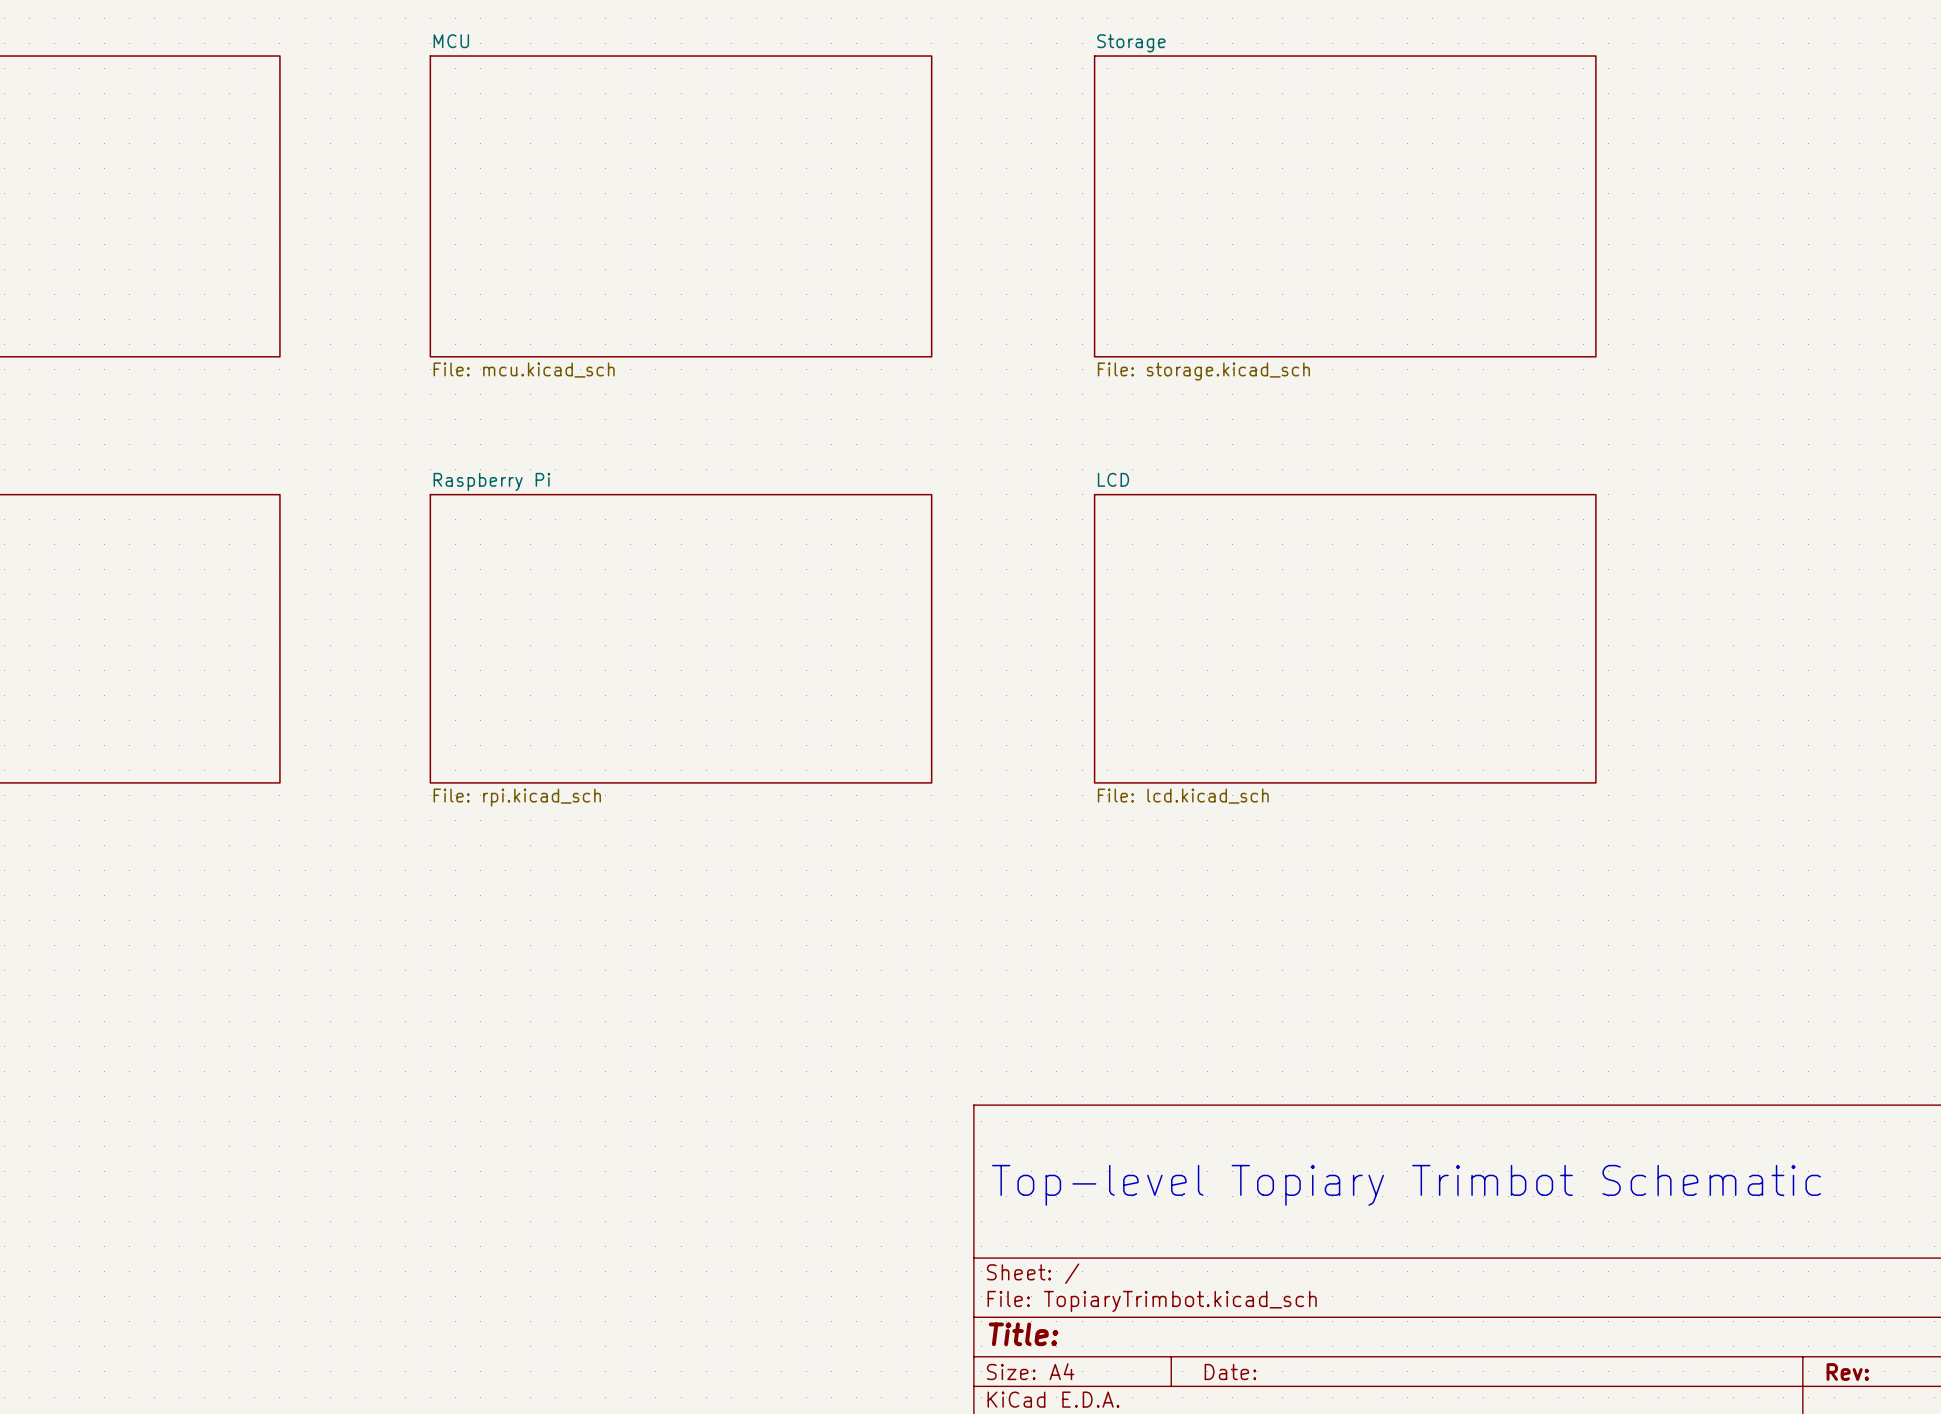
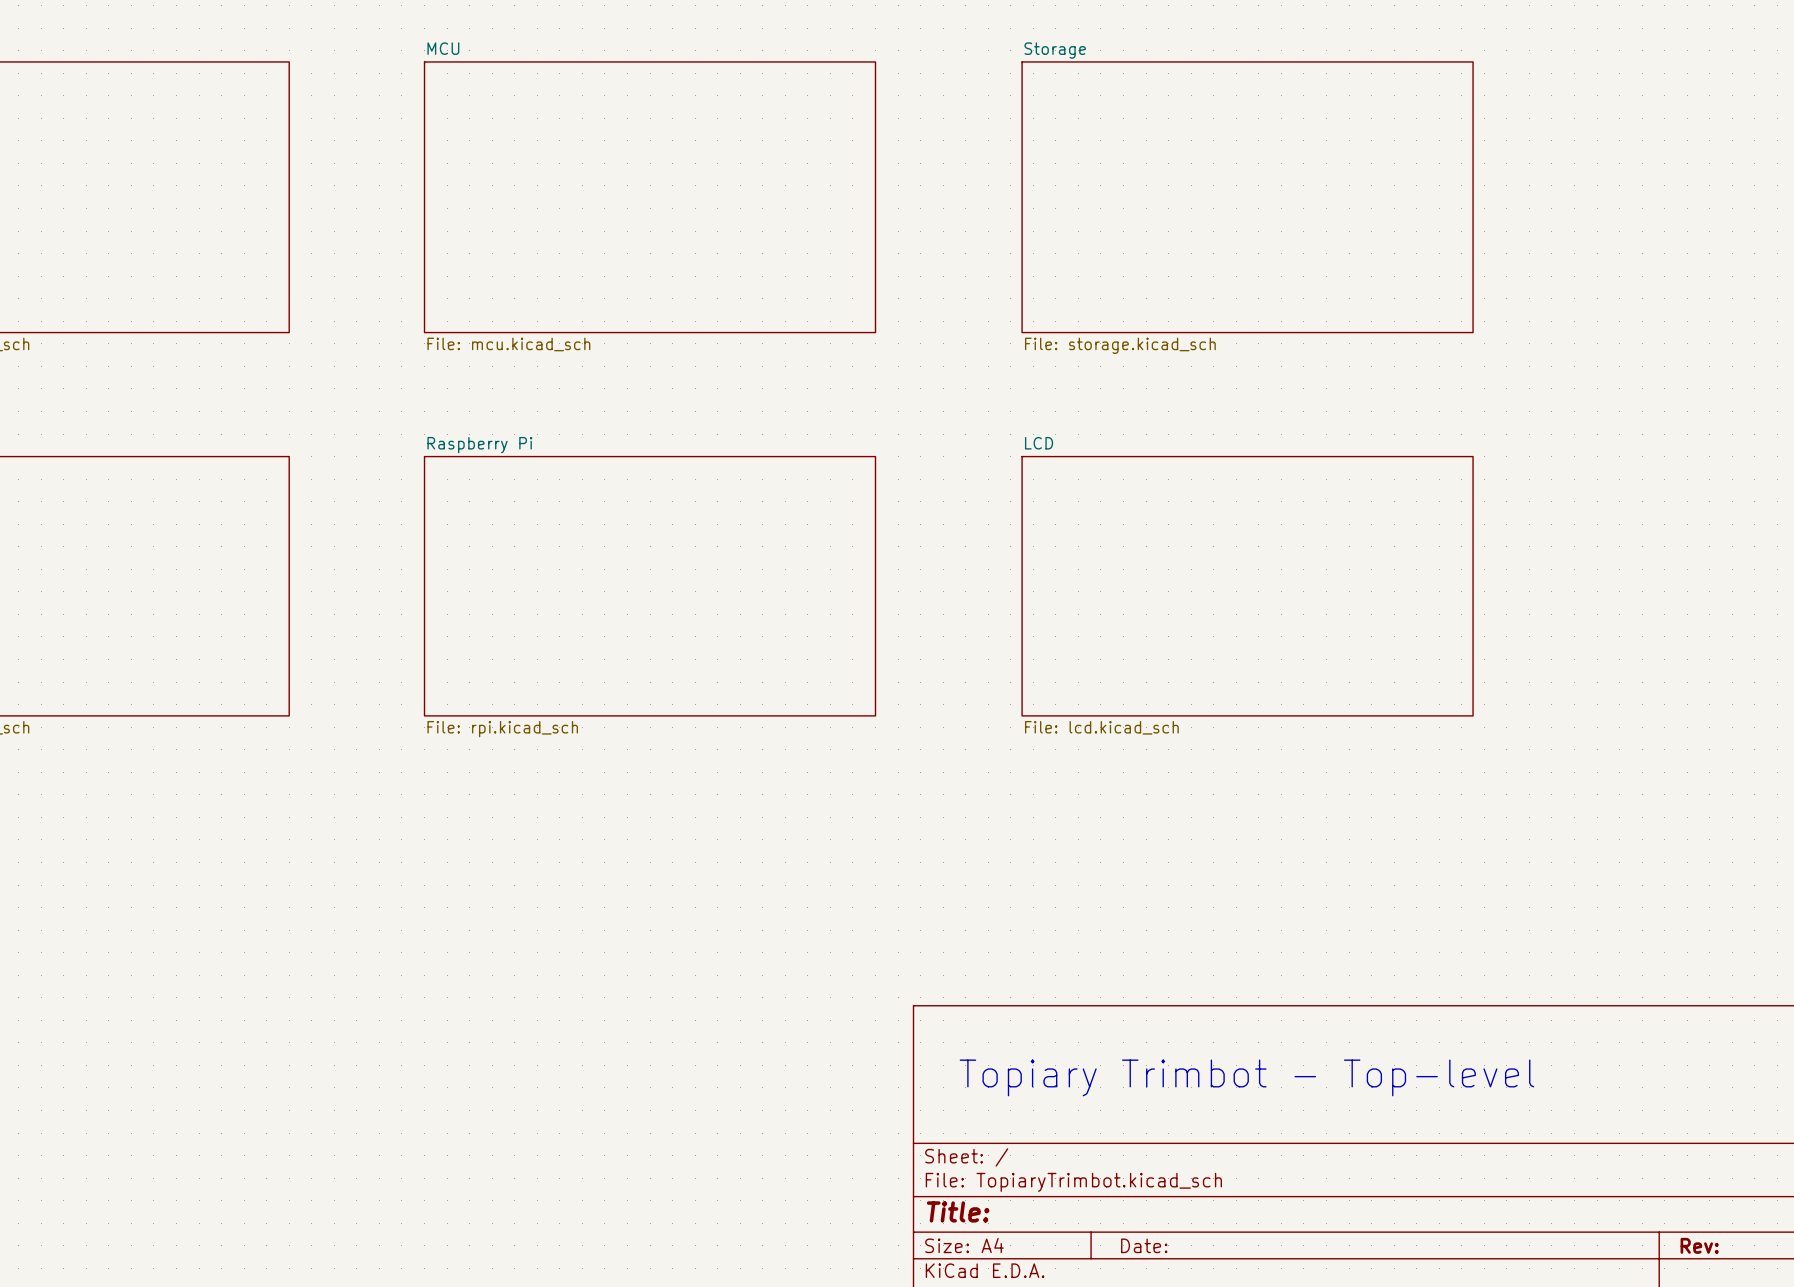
text: none -> Topiary Trimbot - Top-level (1246, 1077)
text: Top-level Topiary Trimbot Schematic (1406, 1185) -> none

